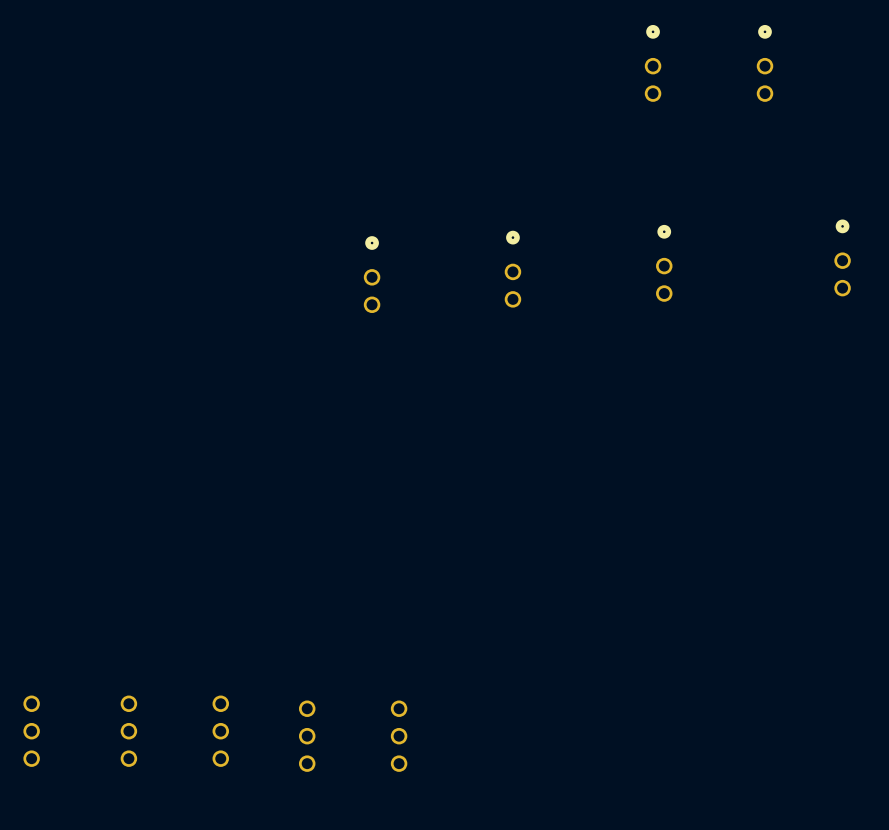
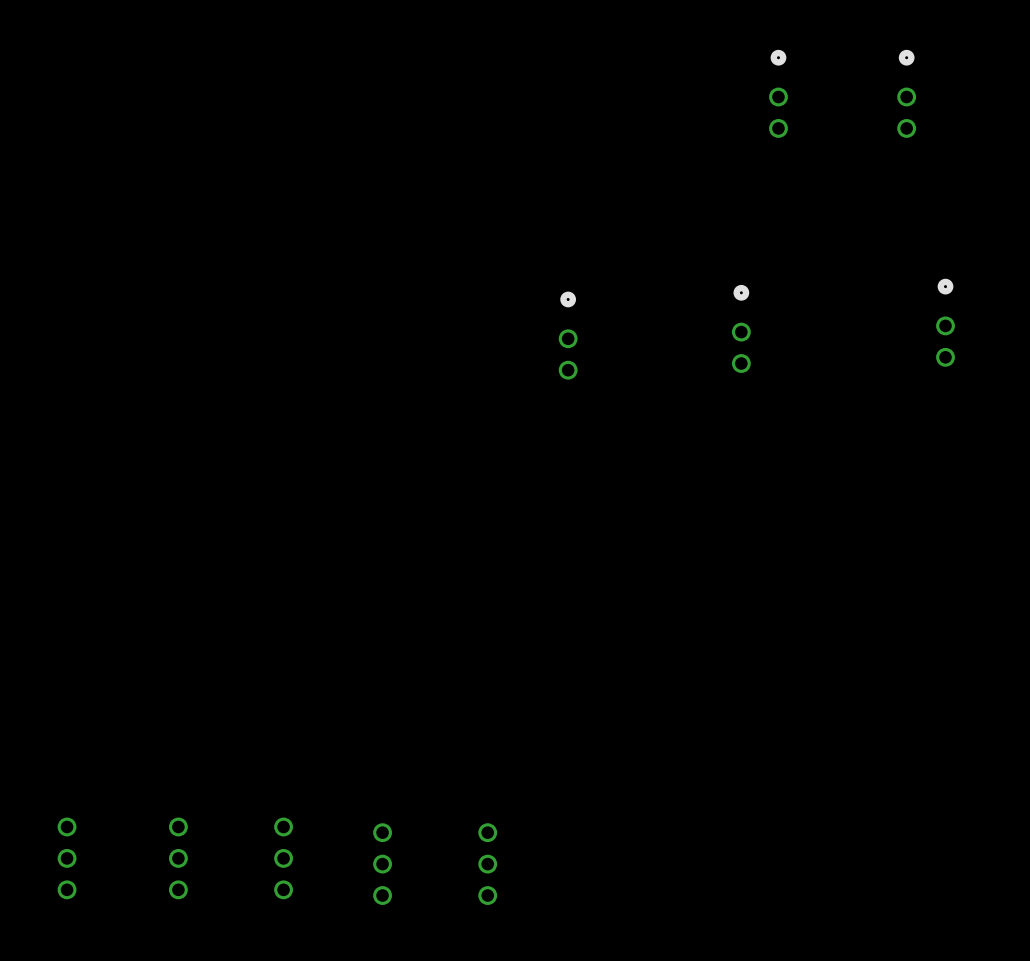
part position: (842, 257) -> (945, 322)
part position: (664, 263) -> (741, 328)
part position: (512, 269) -> (568, 335)
part: (372, 274) -> none

